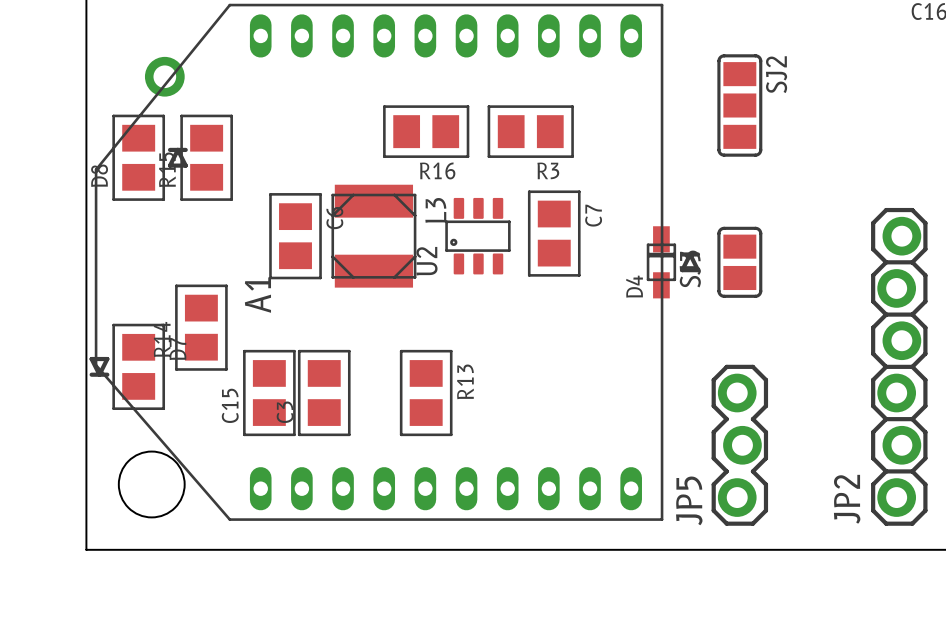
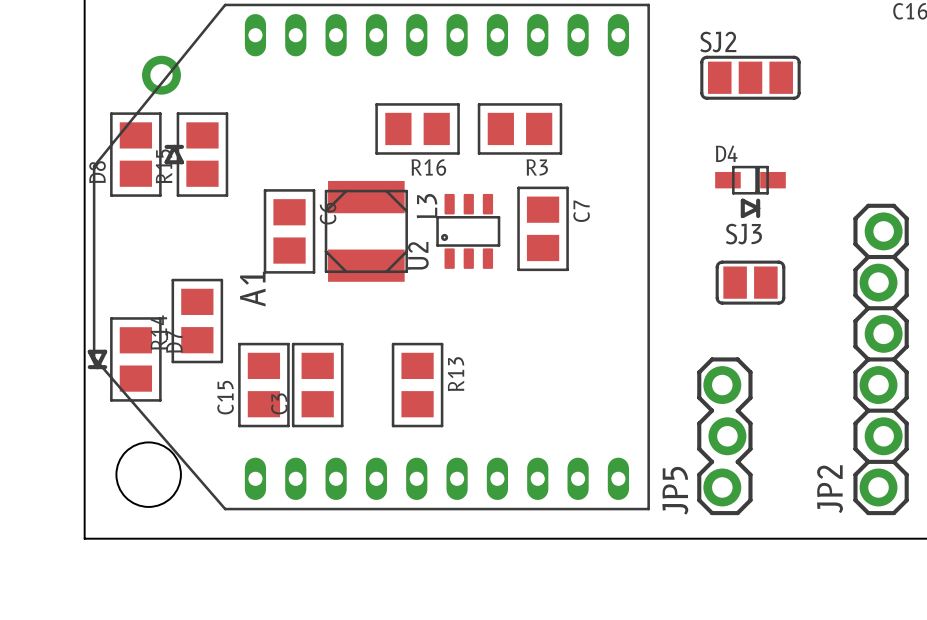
SJ2 name position: SJ2 (776, 74) -> SJ2 (718, 42)
SJ2 rotation: 0° (739, 105) -> 90° clockwise (750, 77)
D4 rotation: 0° (673, 262) -> 90° clockwise (750, 191)
D4 position: (673, 262) -> (750, 191)
SJ3 rotation: 0° (739, 262) -> 90° clockwise (750, 282)

